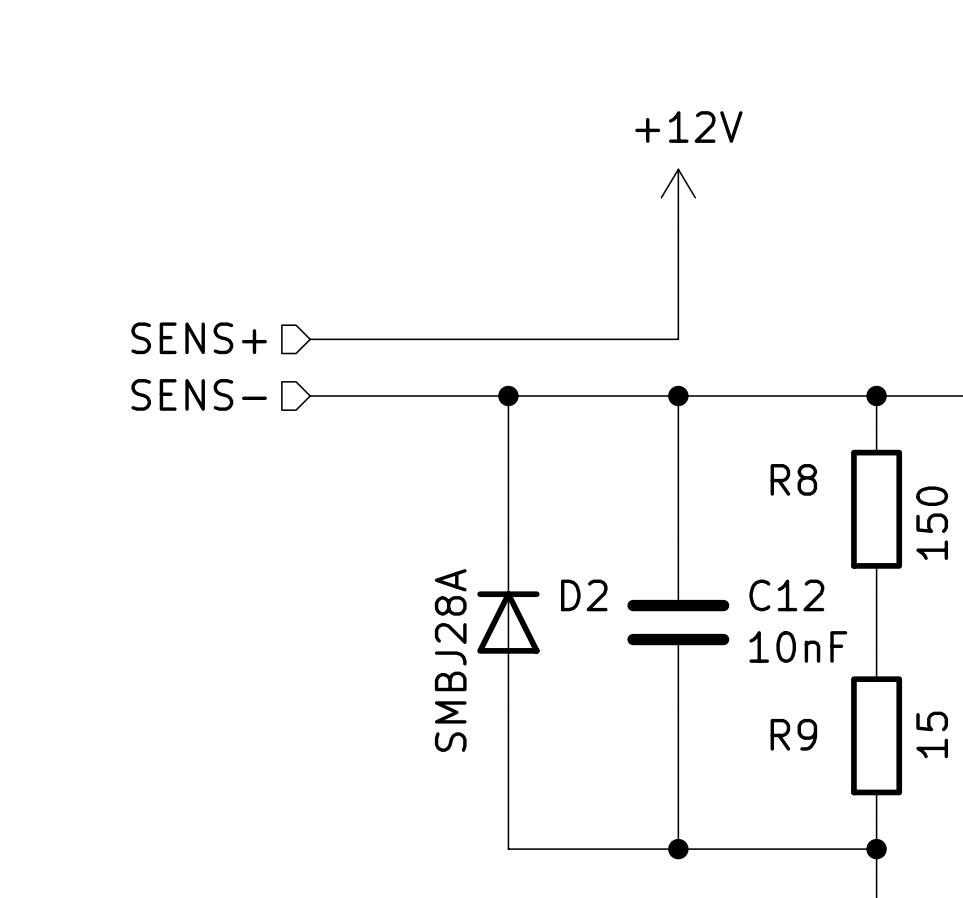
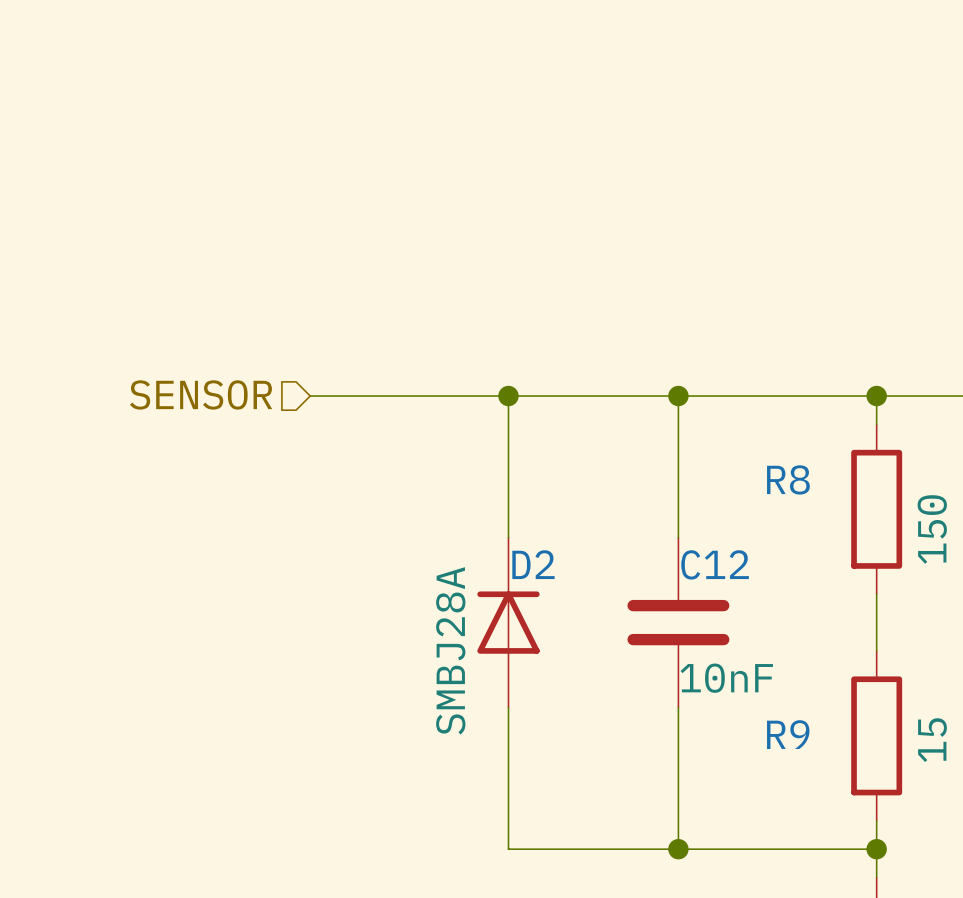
power symbol: +12V (678, 197) -> none
wire: (678, 226) (678, 339) (310, 339) -> none
hierarchical label: SENS+ (199, 338) -> none
hierarchical label: SENS- (199, 394) -> SENSOR (201, 394)
D2 name position: D2 (584, 595) -> D2 (533, 564)
C12 name position: C12 (786, 595) -> C12 (715, 564)
C12 value position: 10nF (798, 646) -> 10nF (726, 678)

